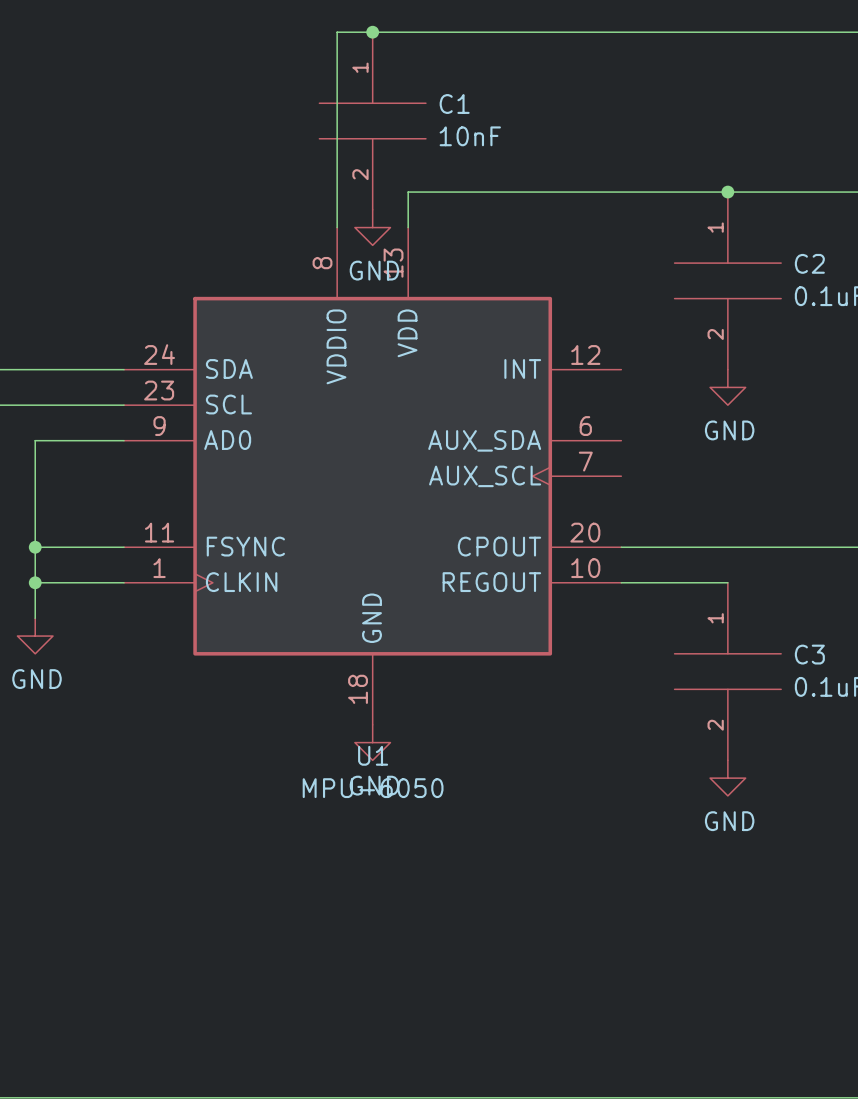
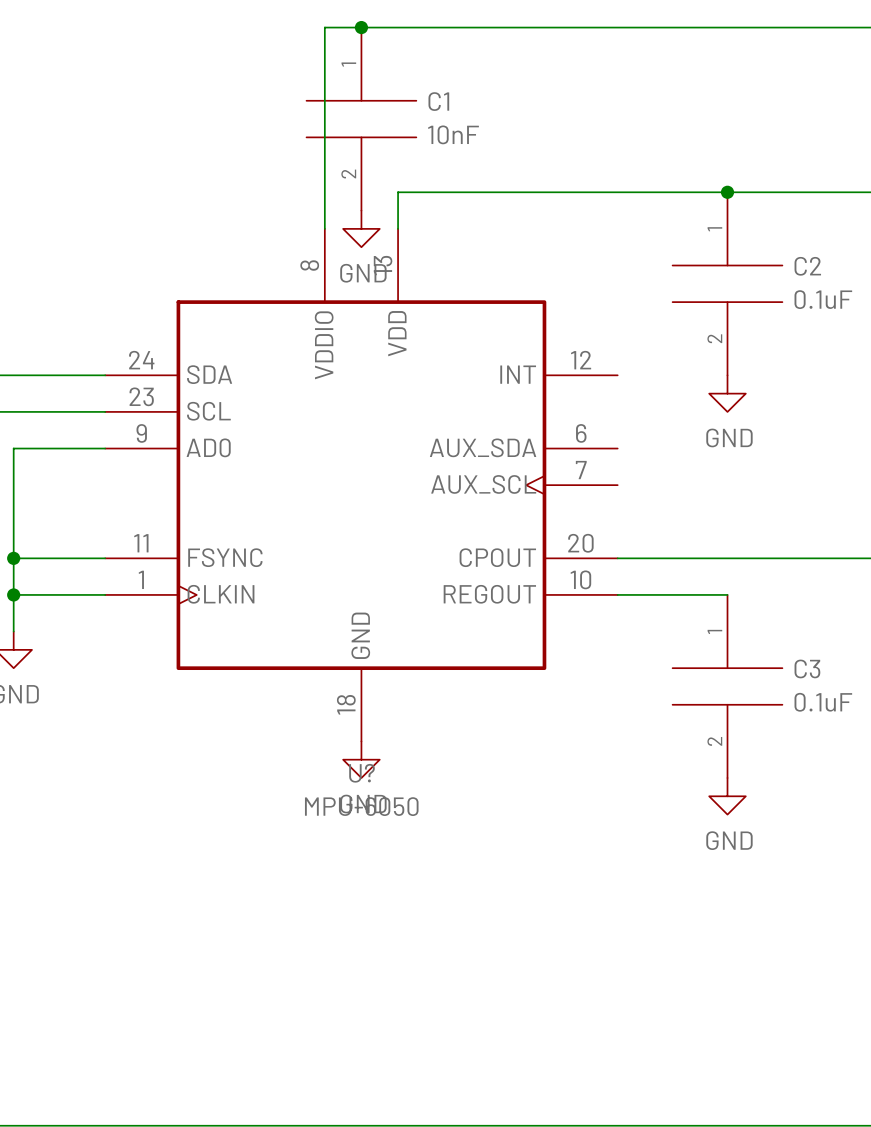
U1 name: U1 (373, 755) -> U? (362, 773)

